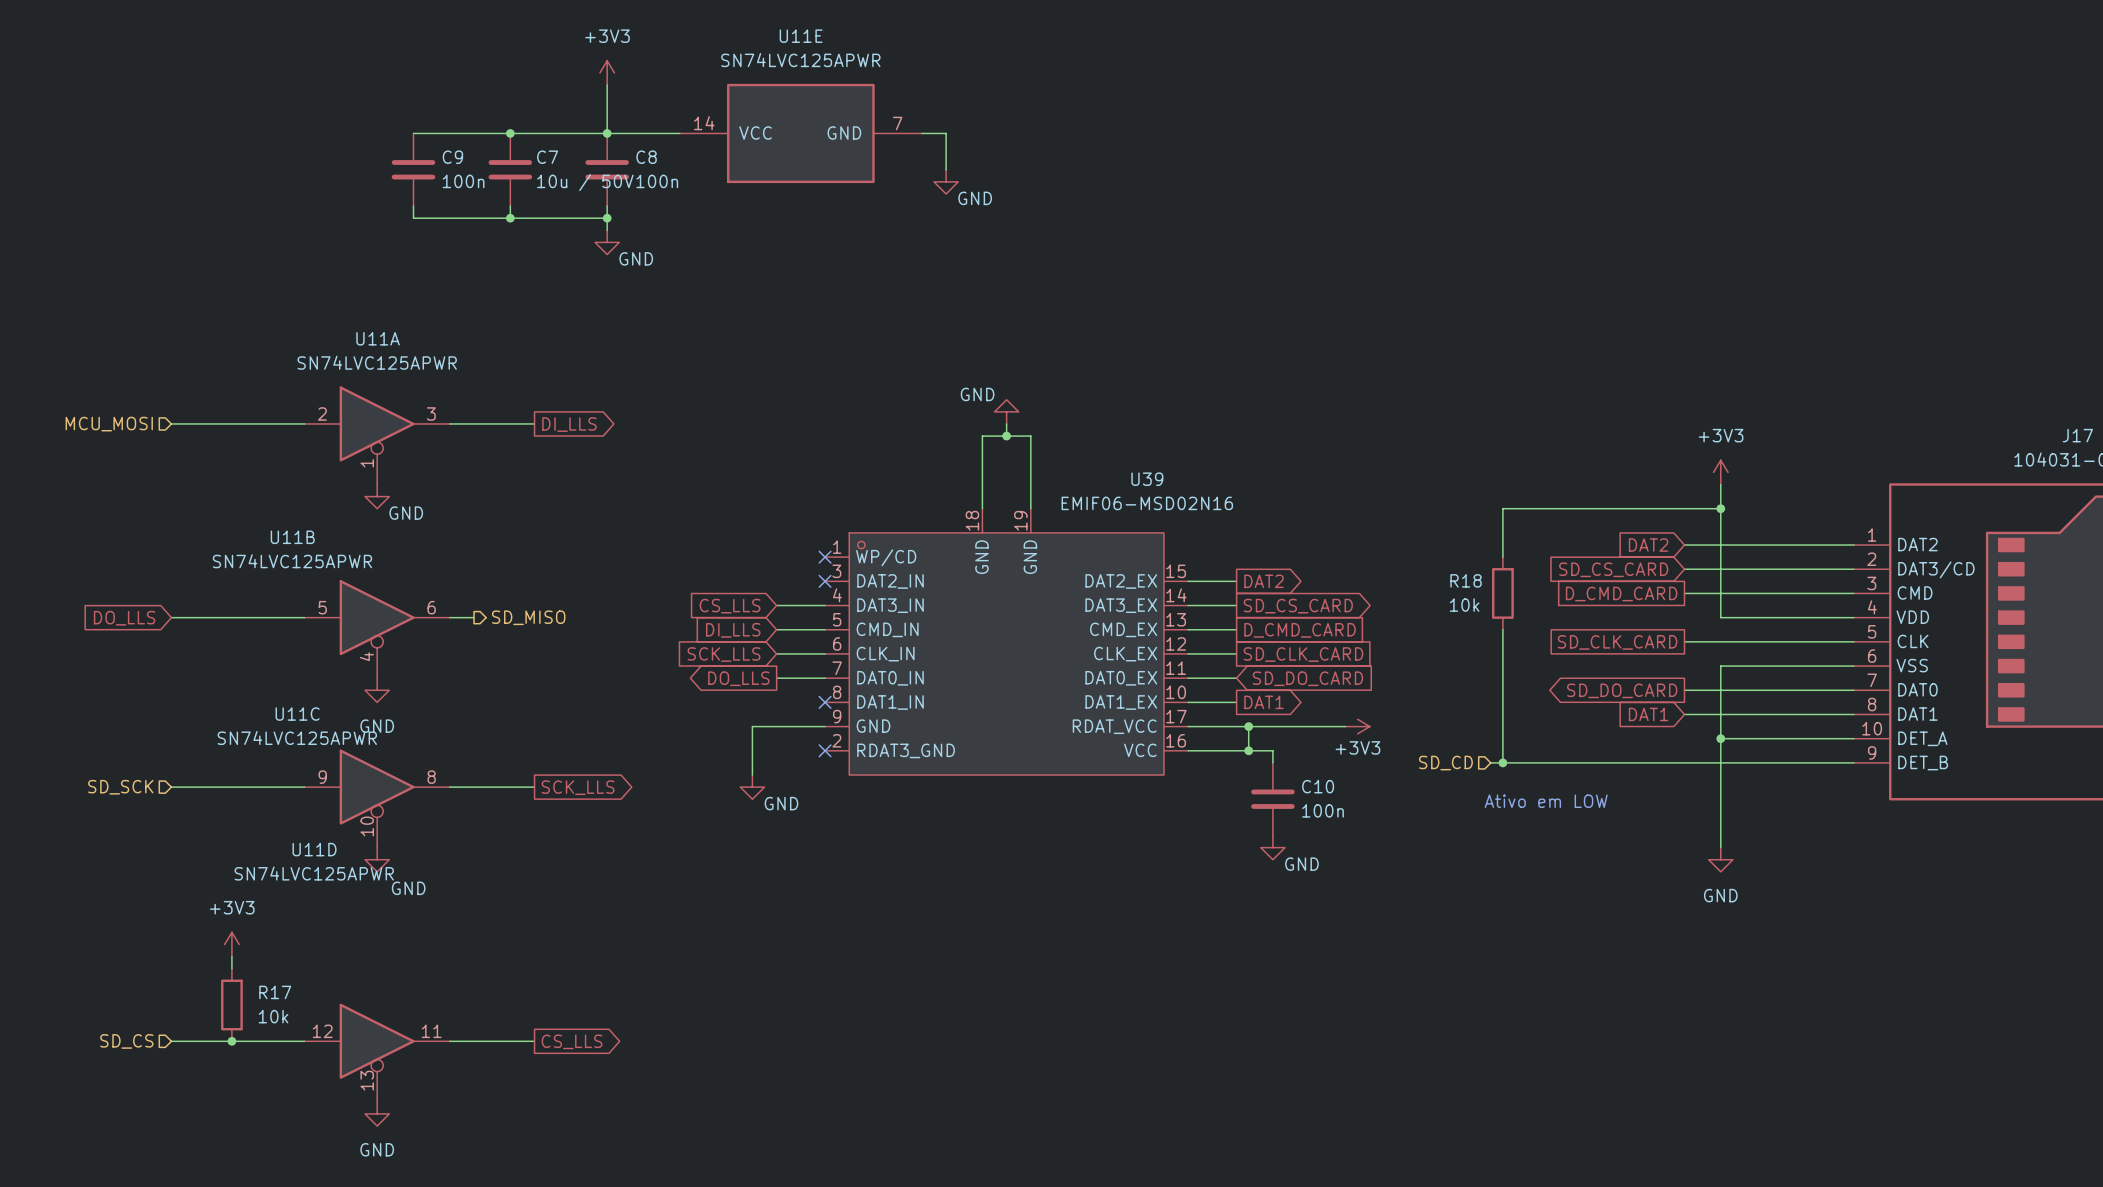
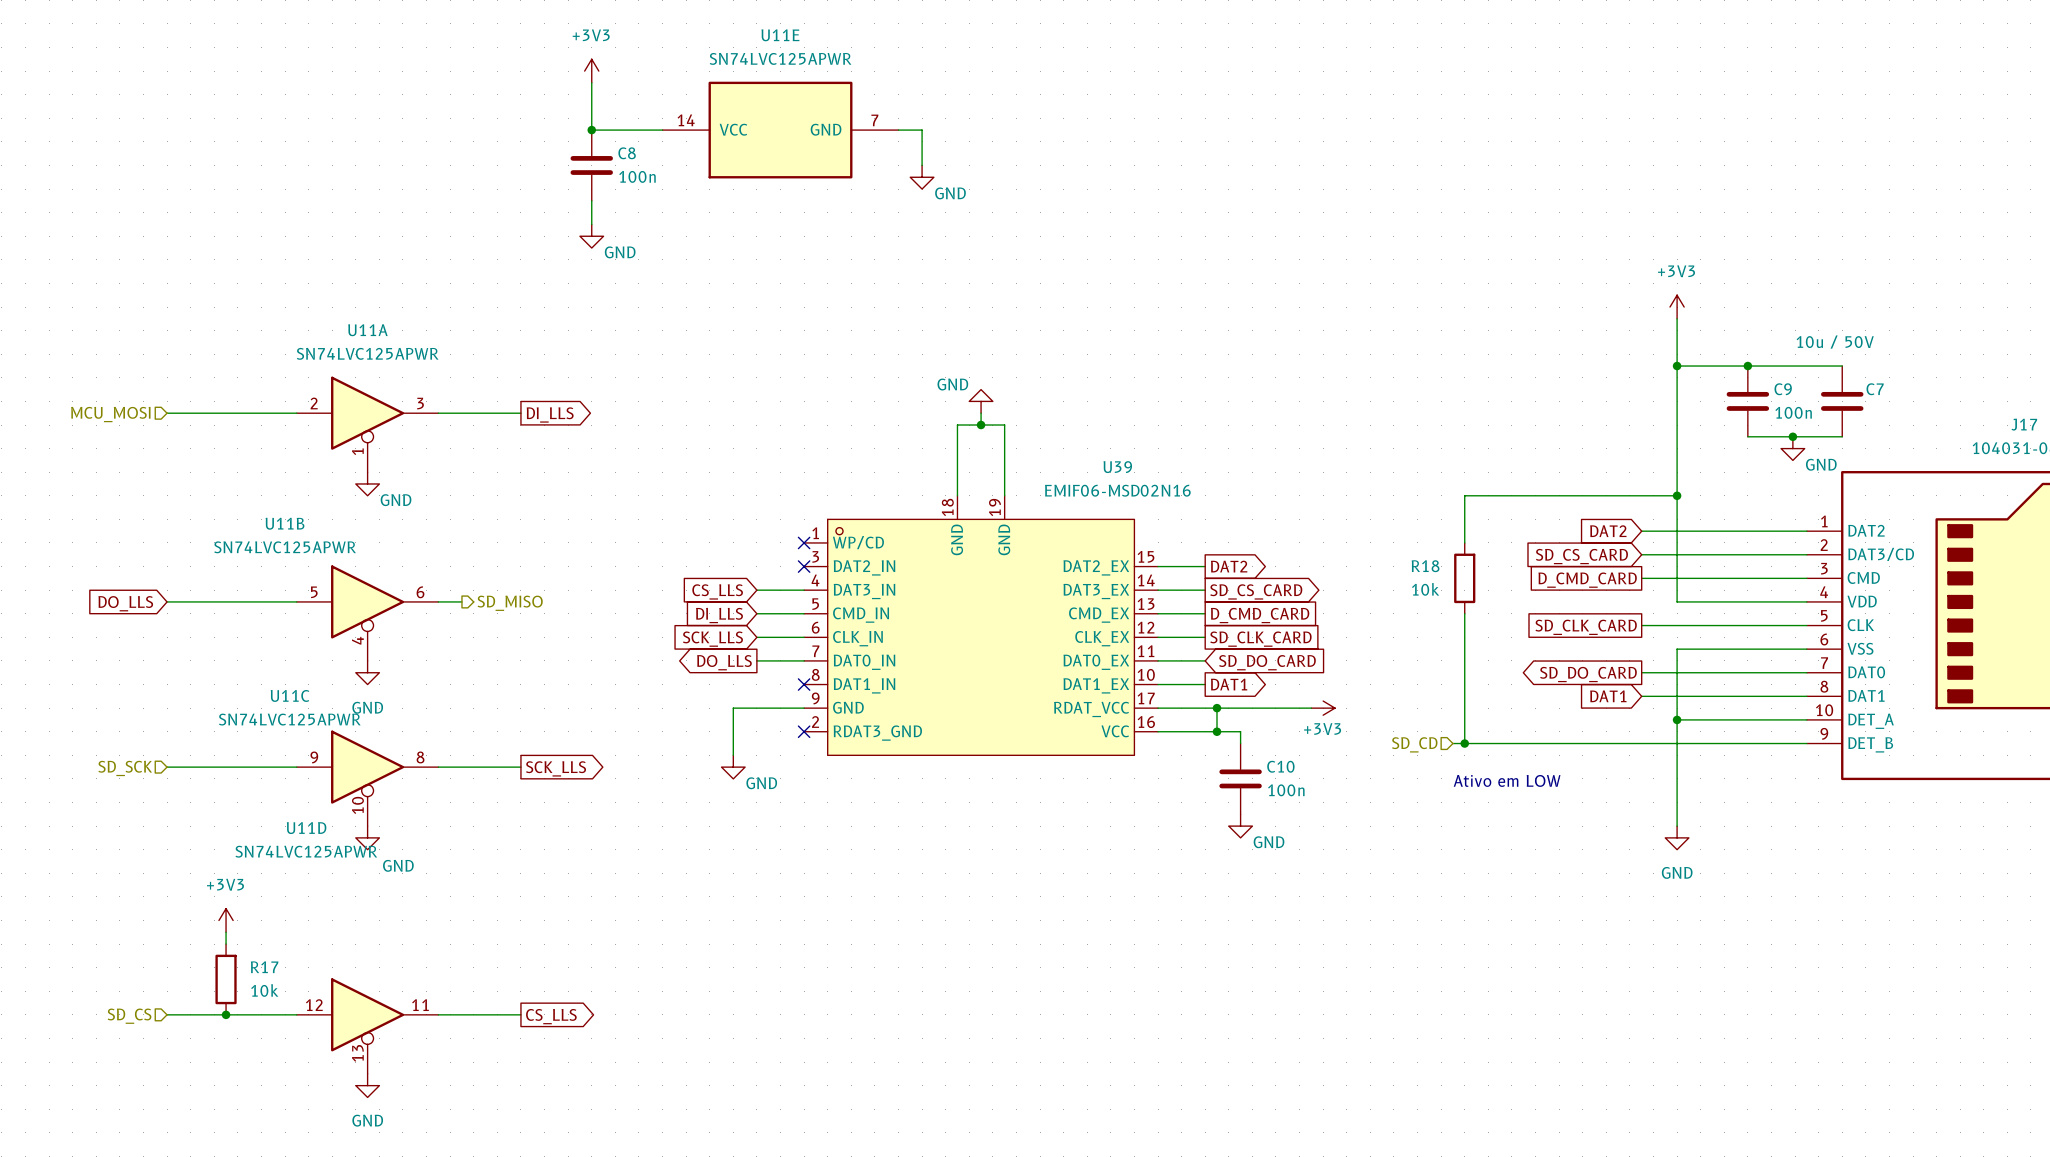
wire: (413, 133) (607, 133) -> none
junction: (510, 133) -> none
C9 position: (413, 169) -> (1747, 401)
C7 position: (510, 169) -> (1842, 401)
C7 value position: 10u / 50V (585, 182) -> 10u / 50V (1835, 342)
wire: (413, 206) (413, 218) (607, 218) -> none
wire: (510, 206) (510, 218) -> none
junction: (510, 218) -> none
junction: (607, 218) -> none
wire: none -> (1677, 318) (1677, 472)
wire: none -> (1677, 366) (1842, 366)
junction: none -> (1677, 366)
junction: none -> (1747, 366)
wire: none -> (1747, 436) (1842, 436)
junction: none -> (1792, 436)
power symbol: none -> GND (1792, 448)
power symbol position: +3V3 (1720, 472) -> +3V3 (1677, 307)

